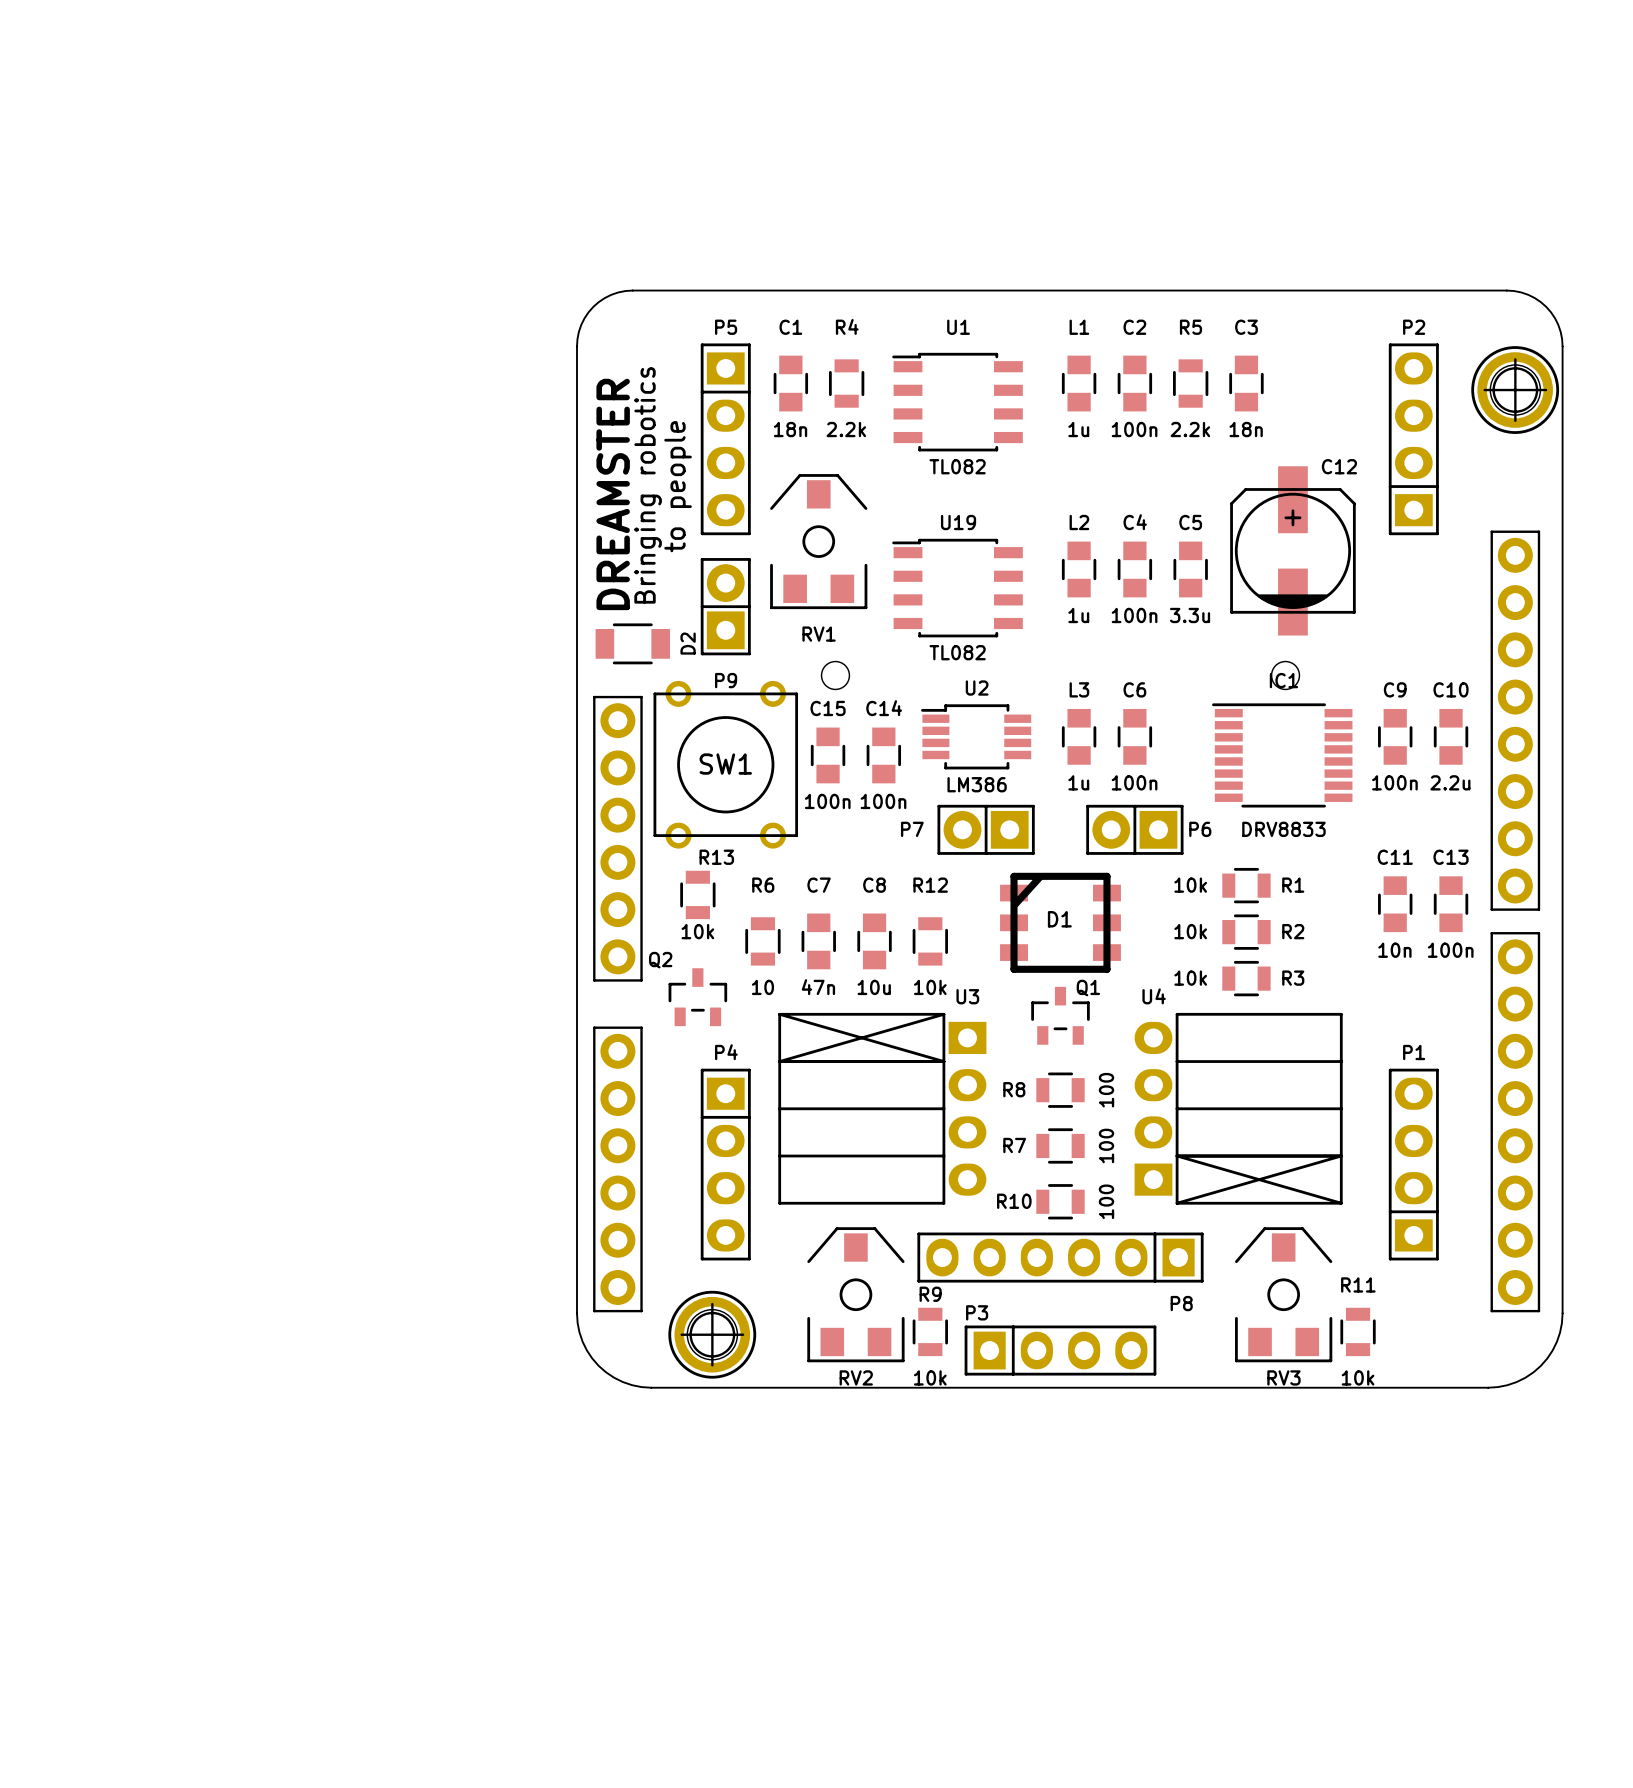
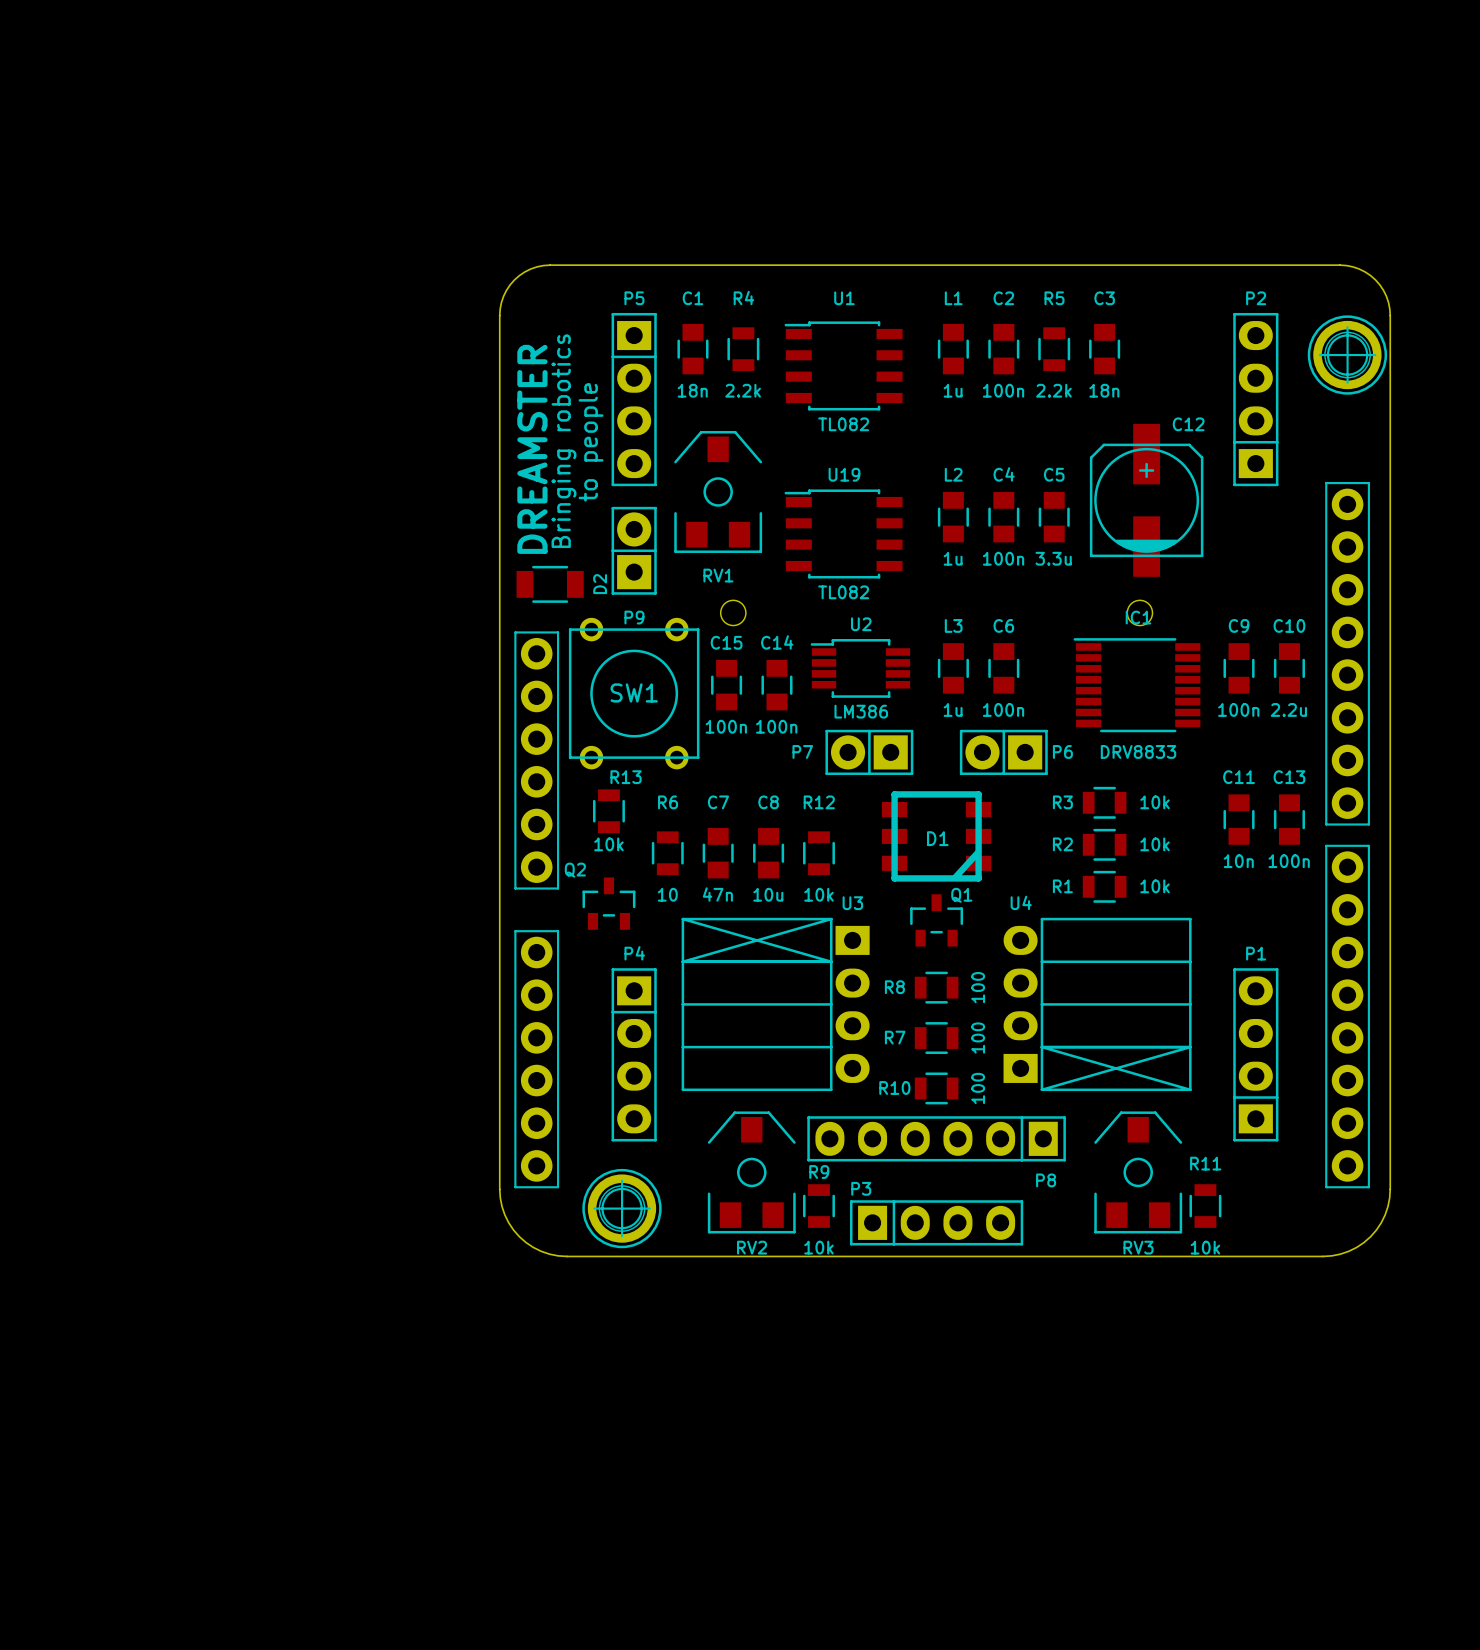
R1 value position: 10k (1190, 885) -> 10k (1155, 802)
R1 name: R1 (1293, 885) -> R3 (1062, 802)
D1 rotation: 0° (1060, 922) -> 180° (936, 836)
R2 value position: 10k (1190, 931) -> 10k (1155, 844)
R2 name position: R2 (1293, 931) -> R2 (1062, 844)
R3 value position: 10k (1190, 978) -> 10k (1155, 886)
R3 name: R3 (1293, 978) -> R1 (1062, 886)

